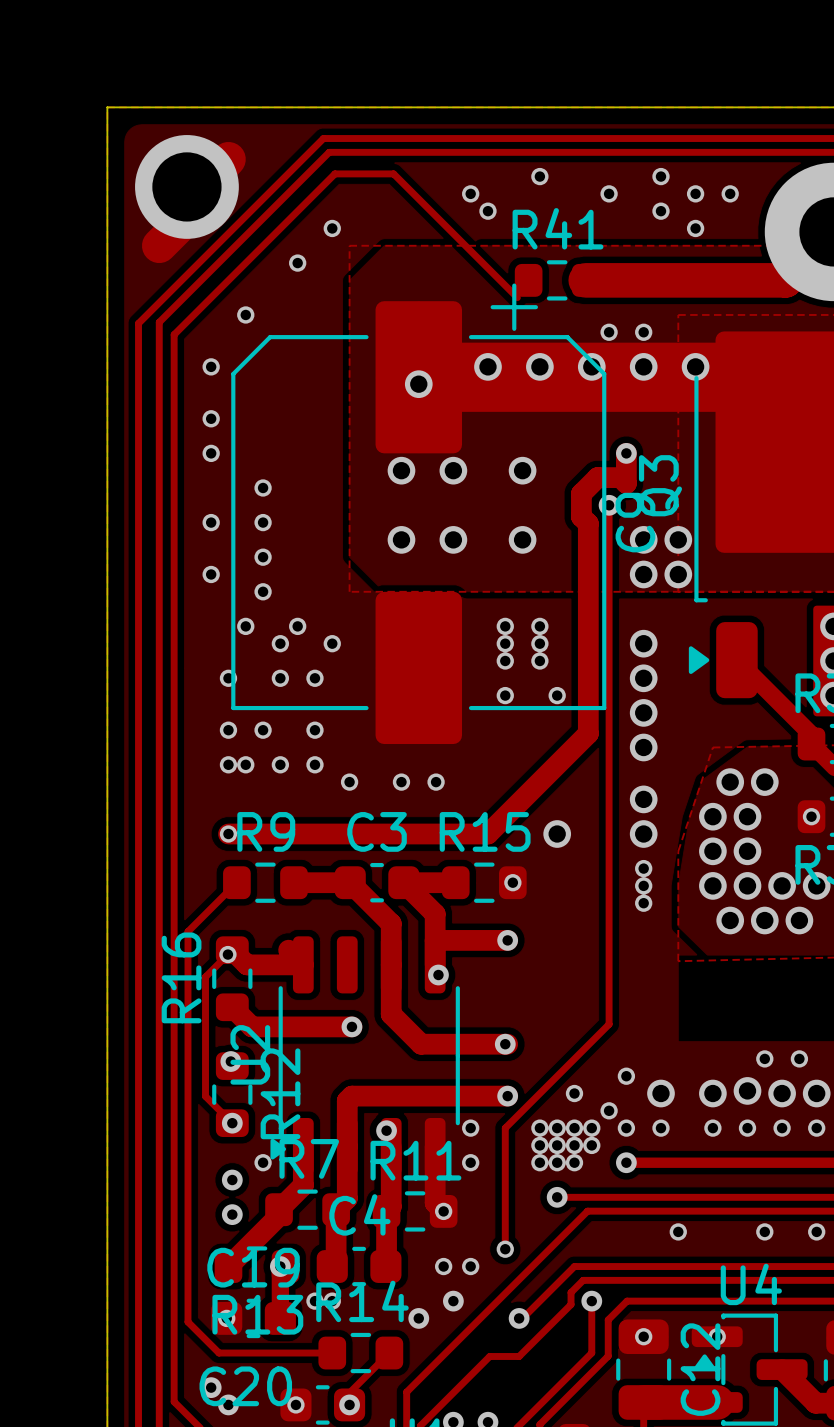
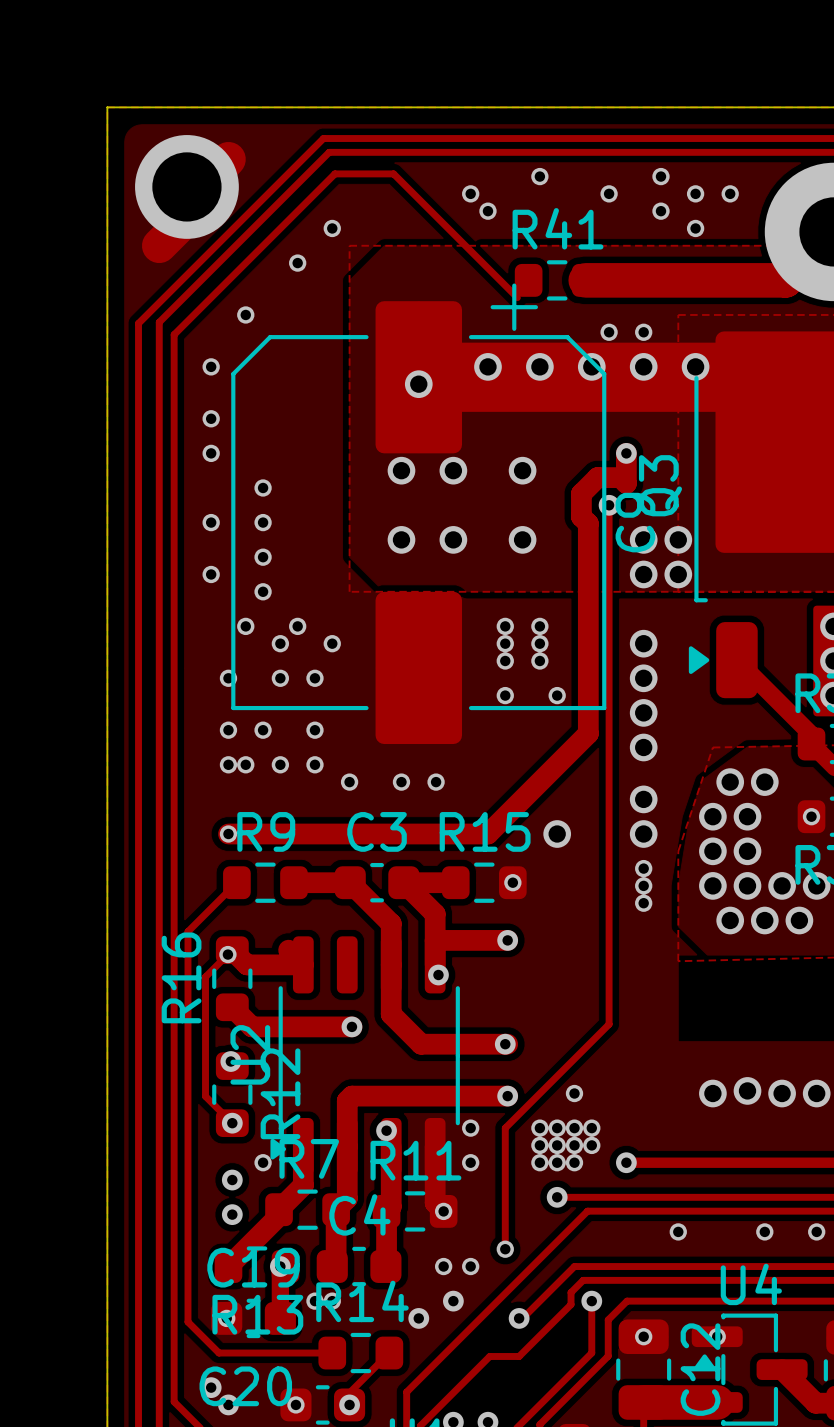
via: (764, 1058) -> none
via: (799, 1058) -> none
via: (626, 1076) -> none
via: (660, 1093) -> none
via: (609, 1110) -> none
via: (626, 1128) -> none
via: (660, 1128) -> none
via: (712, 1128) -> none
via: (747, 1128) -> none
via: (782, 1128) -> none
via: (816, 1128) -> none

